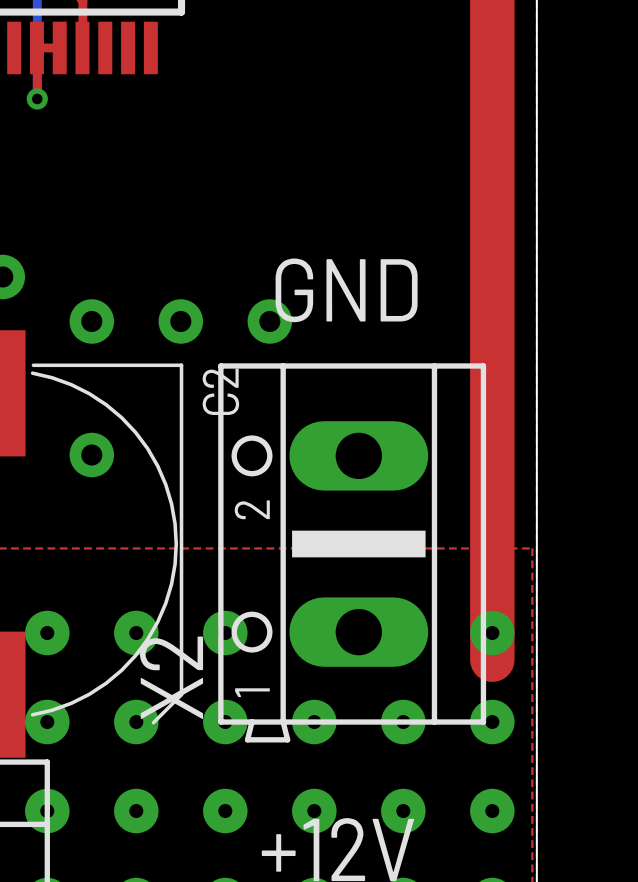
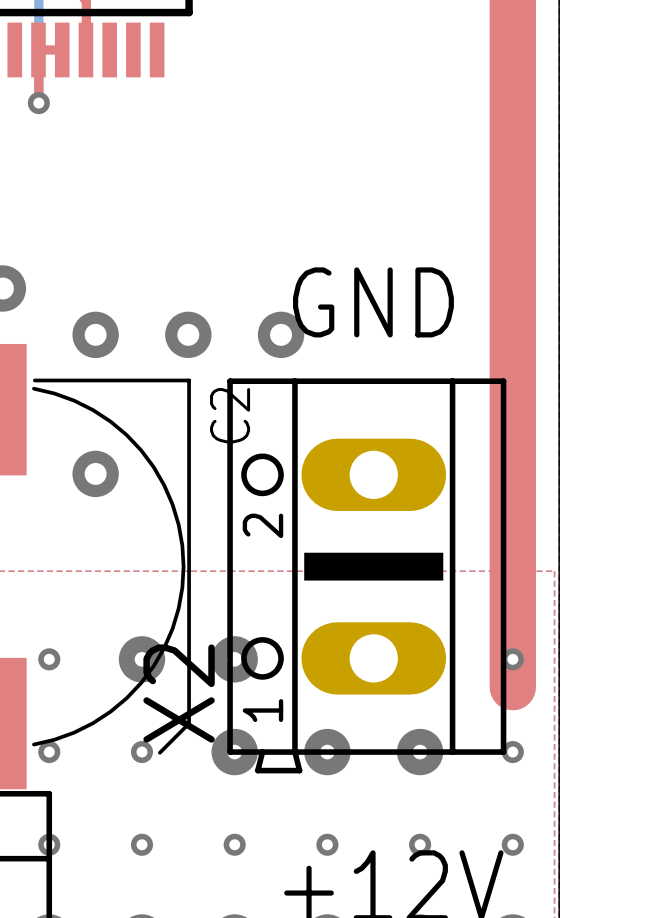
via size: [25, 610, 70, 656] -> [38, 648, 61, 671]
via size: [470, 610, 515, 656] -> [501, 648, 524, 671]
via size: [25, 699, 70, 745] -> [38, 741, 61, 764]
via size: [114, 699, 159, 745] -> [130, 741, 154, 764]
via size: [470, 699, 515, 745] -> [501, 741, 524, 764]
via size: [25, 788, 70, 834] -> [38, 833, 61, 856]
via size: [114, 788, 159, 834] -> [130, 833, 154, 856]
via size: [203, 788, 248, 834] -> [223, 833, 246, 856]
via size: [292, 788, 337, 834] -> [316, 833, 339, 856]
via size: [381, 788, 426, 834] -> [409, 833, 432, 856]
via size: [470, 788, 515, 834] -> [501, 833, 524, 856]

